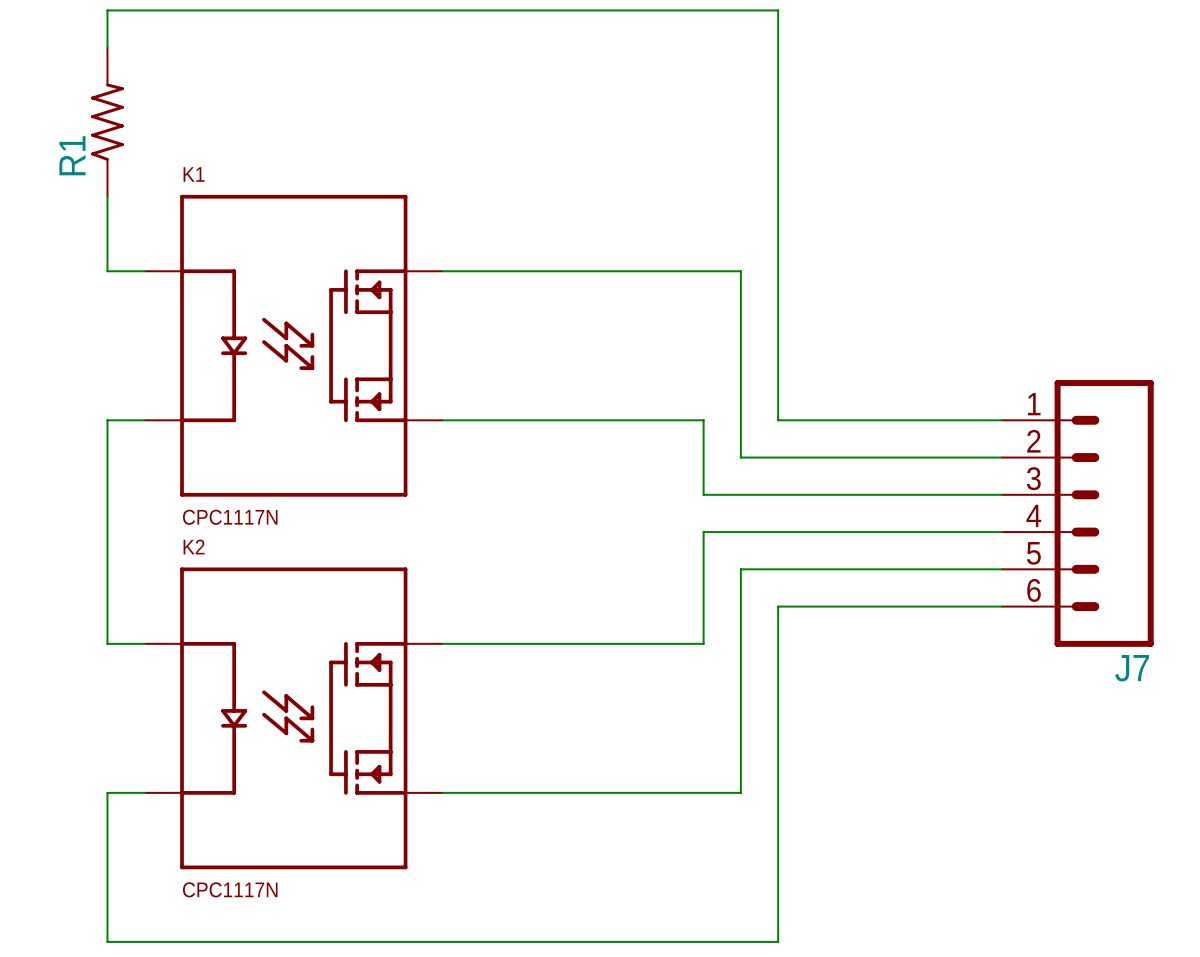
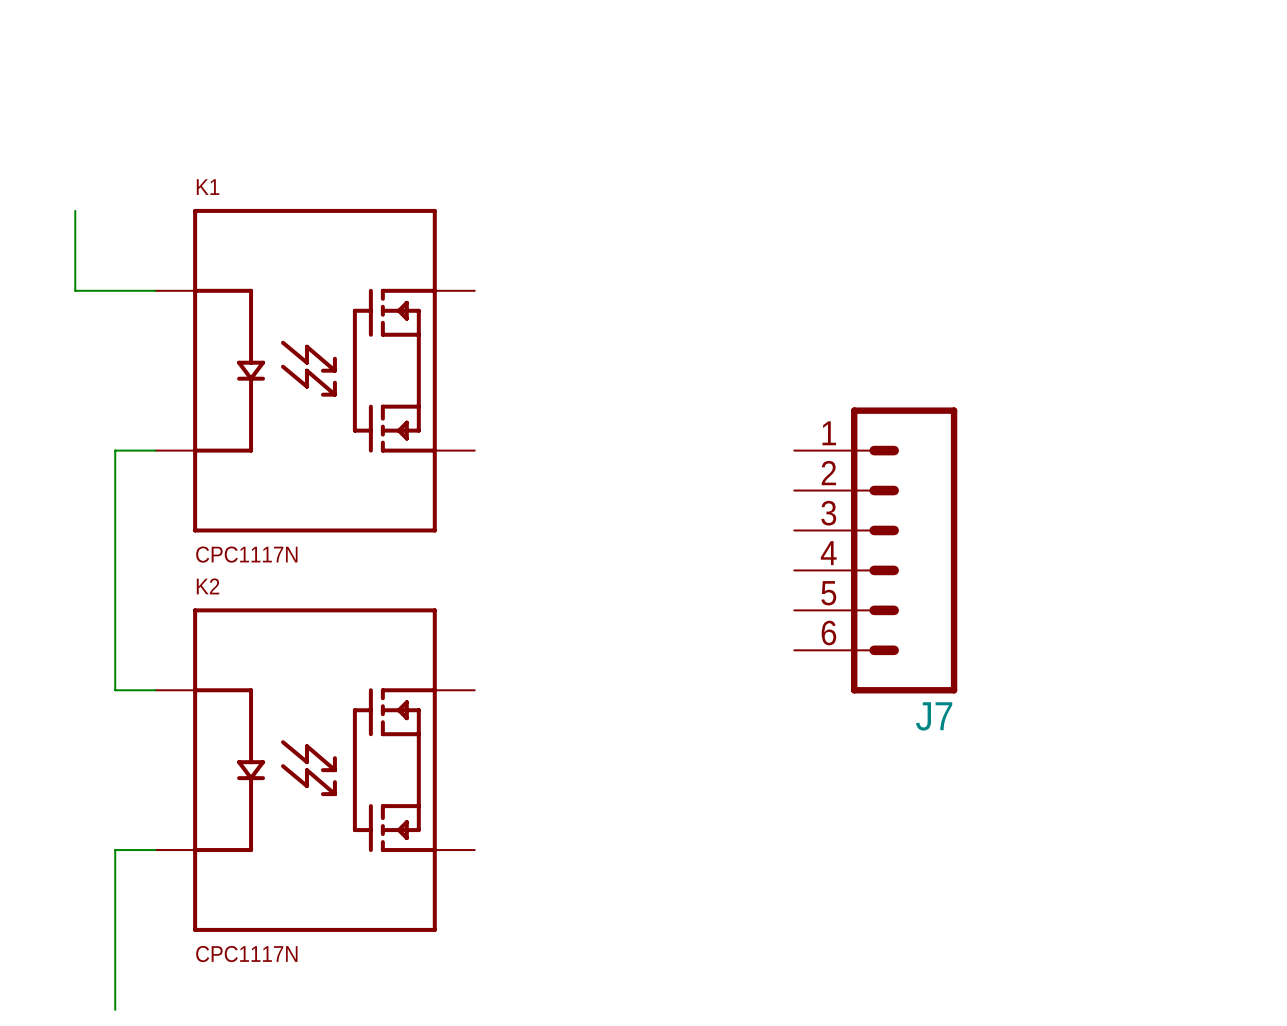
wire: (107, 47) (107, 10) (778, 10) (778, 420) (1001, 420) -> none
R1: (107, 122) -> none
wire: (107, 196) (107, 271) -> (75, 210) (75, 290) (115, 290)
wire: (442, 271) (740, 271) (740, 457) (1001, 457) -> none
wire: (442, 420) (703, 420) (703, 494) (1001, 494) -> none
J7 position: (1077, 513) -> (875, 550)
wire: (1001, 532) (703, 532) (703, 643) (442, 643) -> none
wire: (1001, 569) (740, 569) (740, 792) (442, 792) -> none
wire: (1001, 606) (778, 606) (778, 941) (107, 941) -> none

